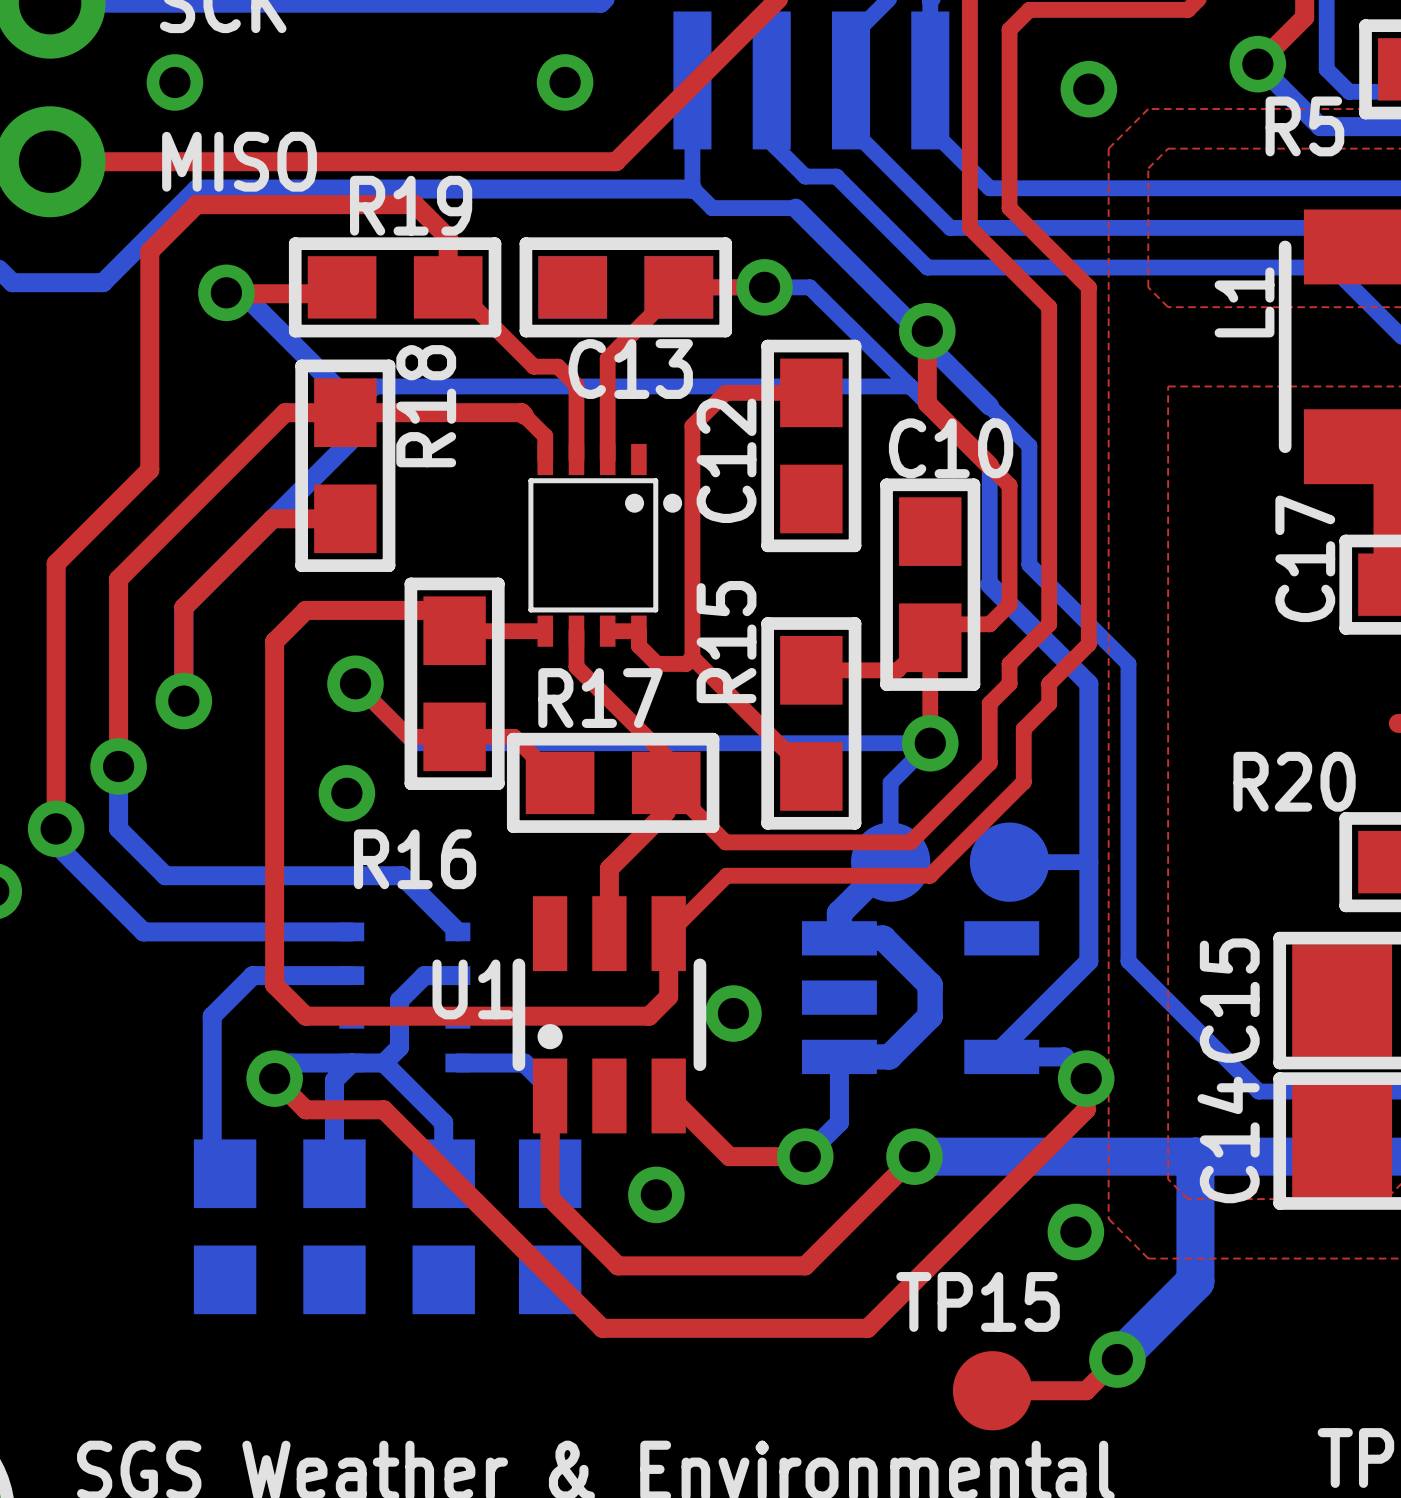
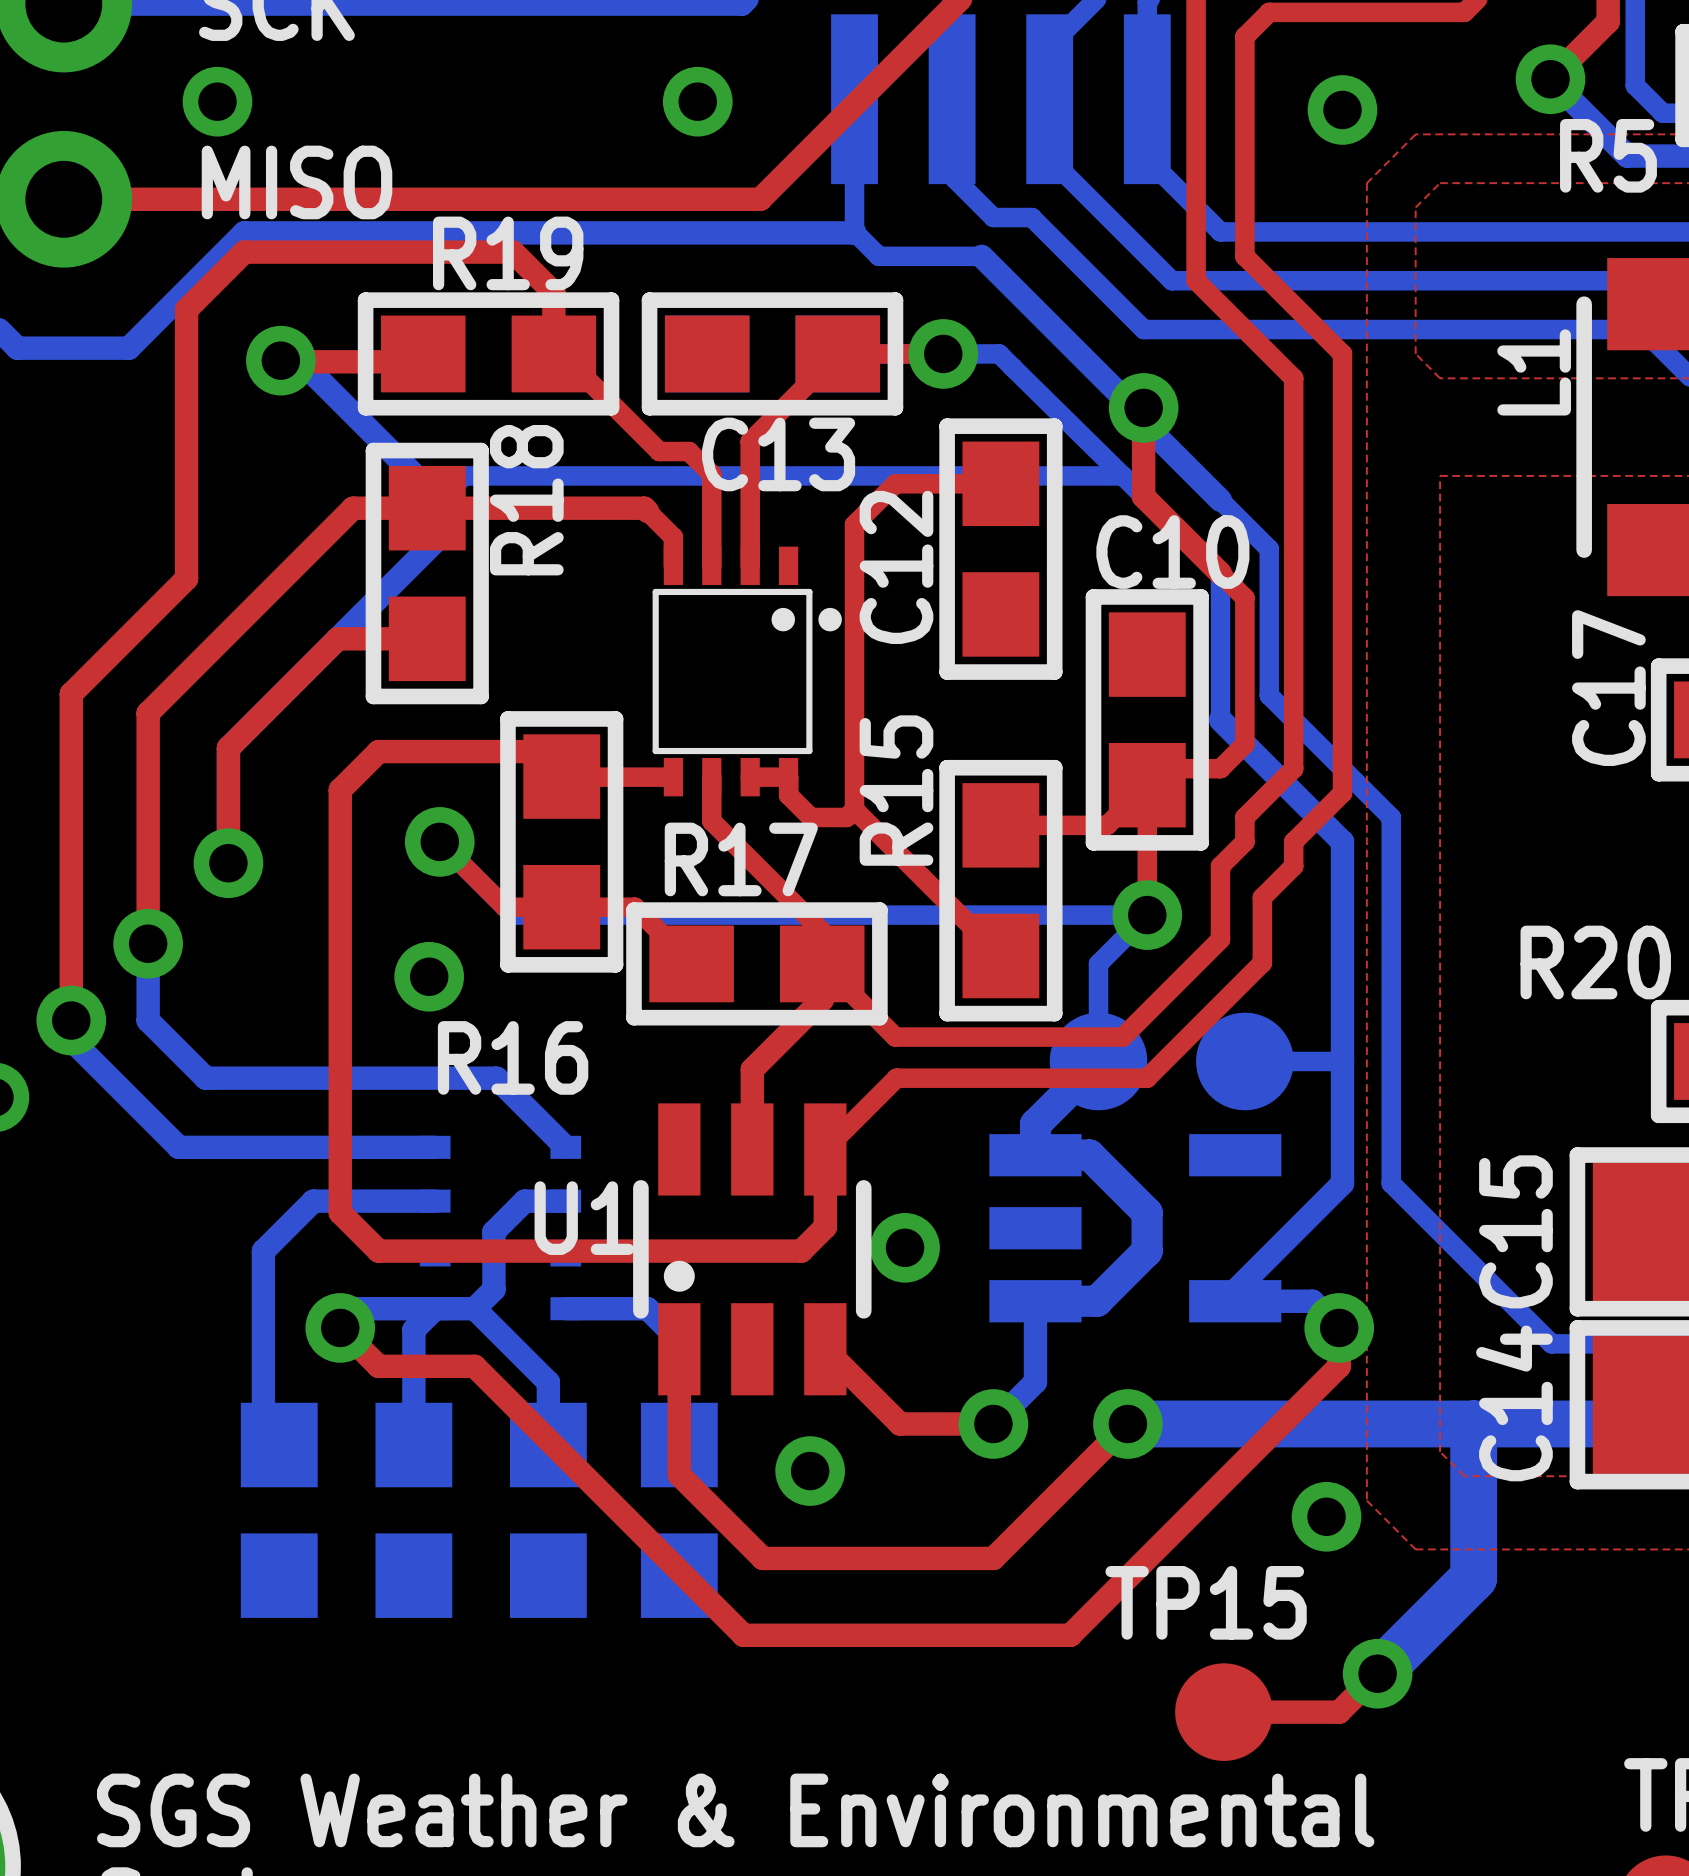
text position: MISO (239, 161) -> MISO (297, 182)

